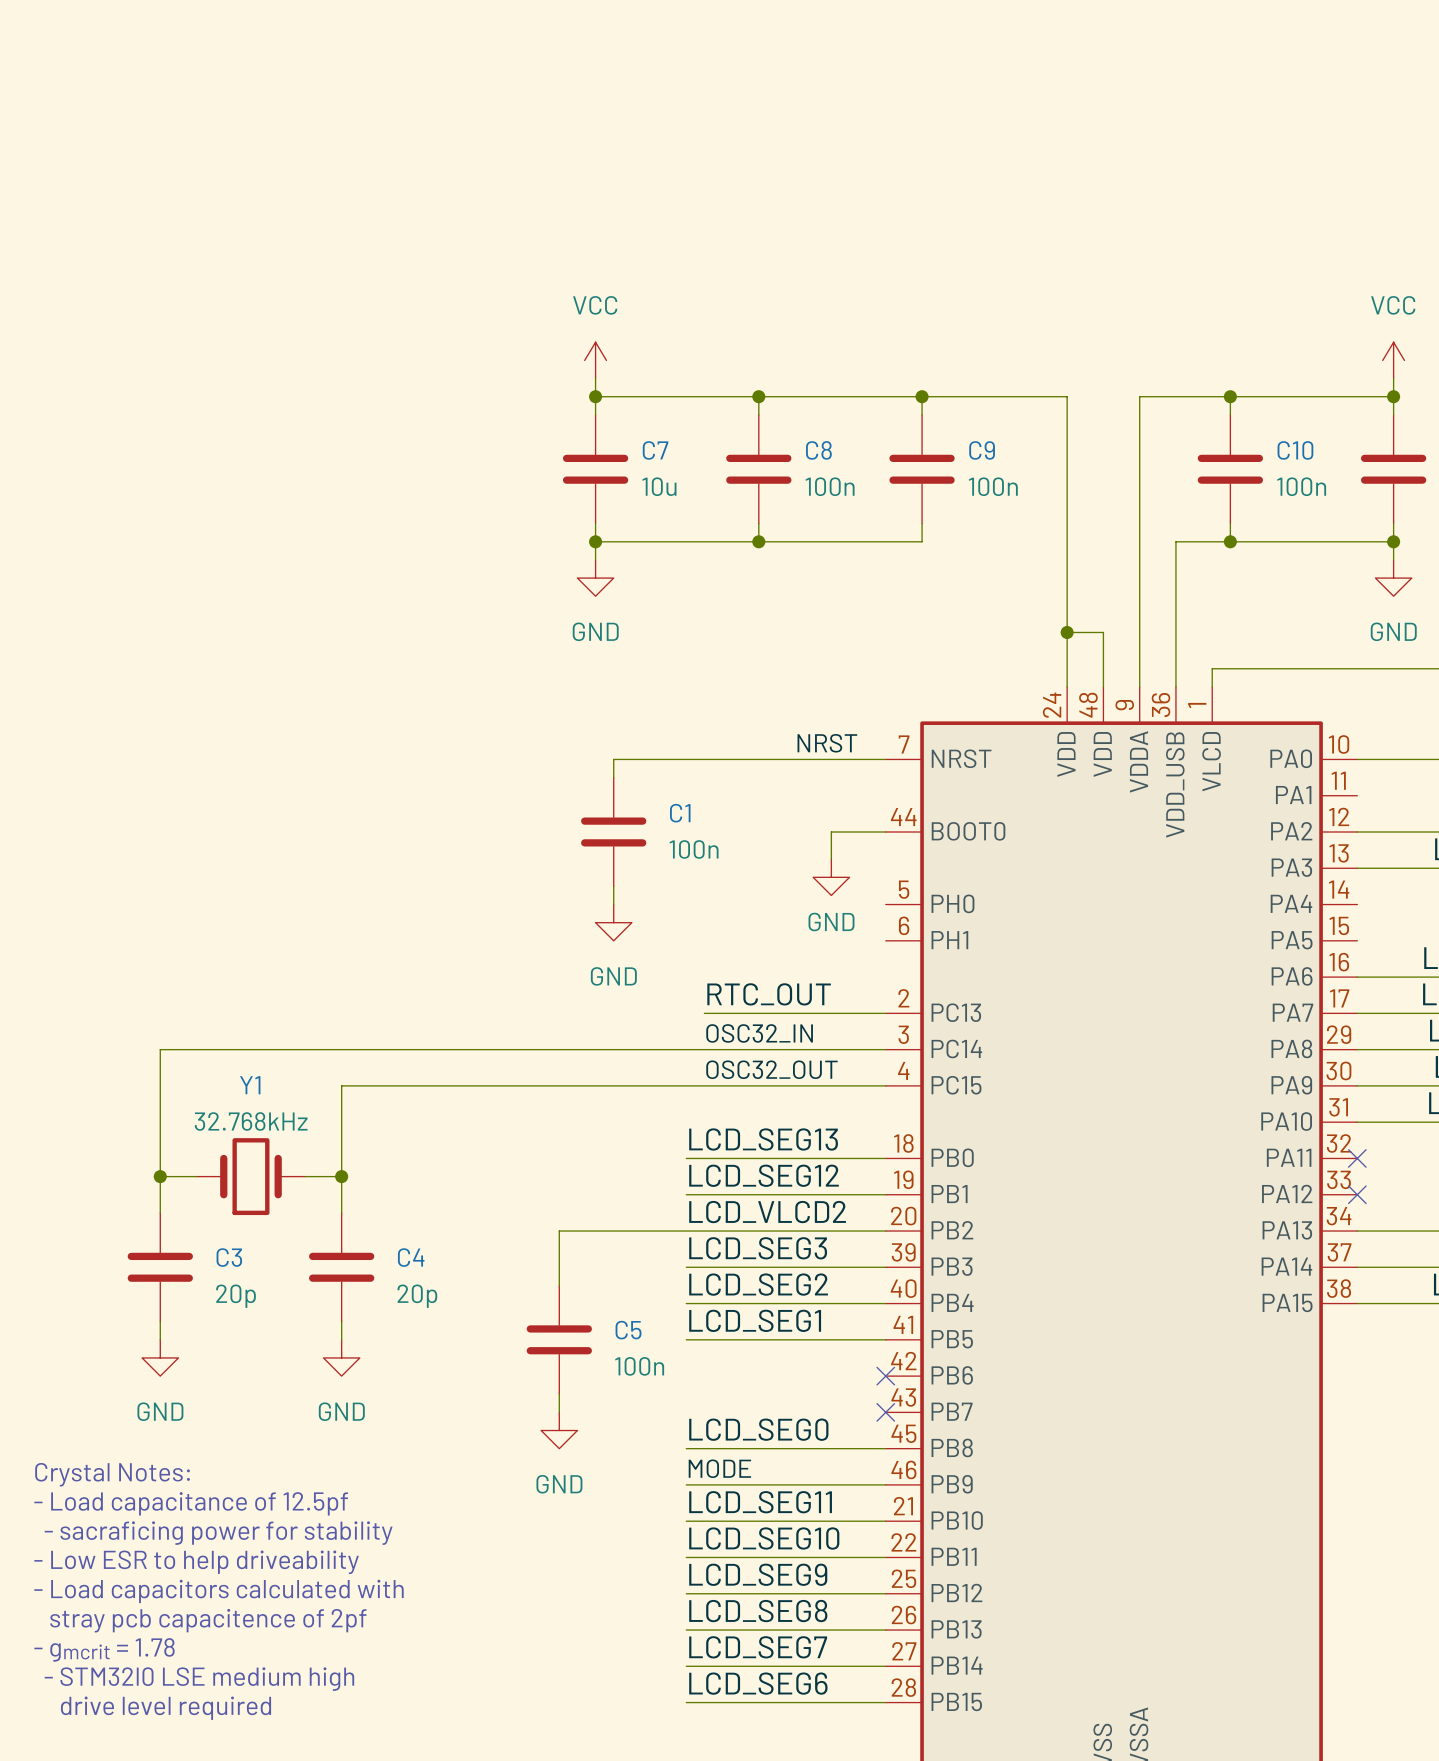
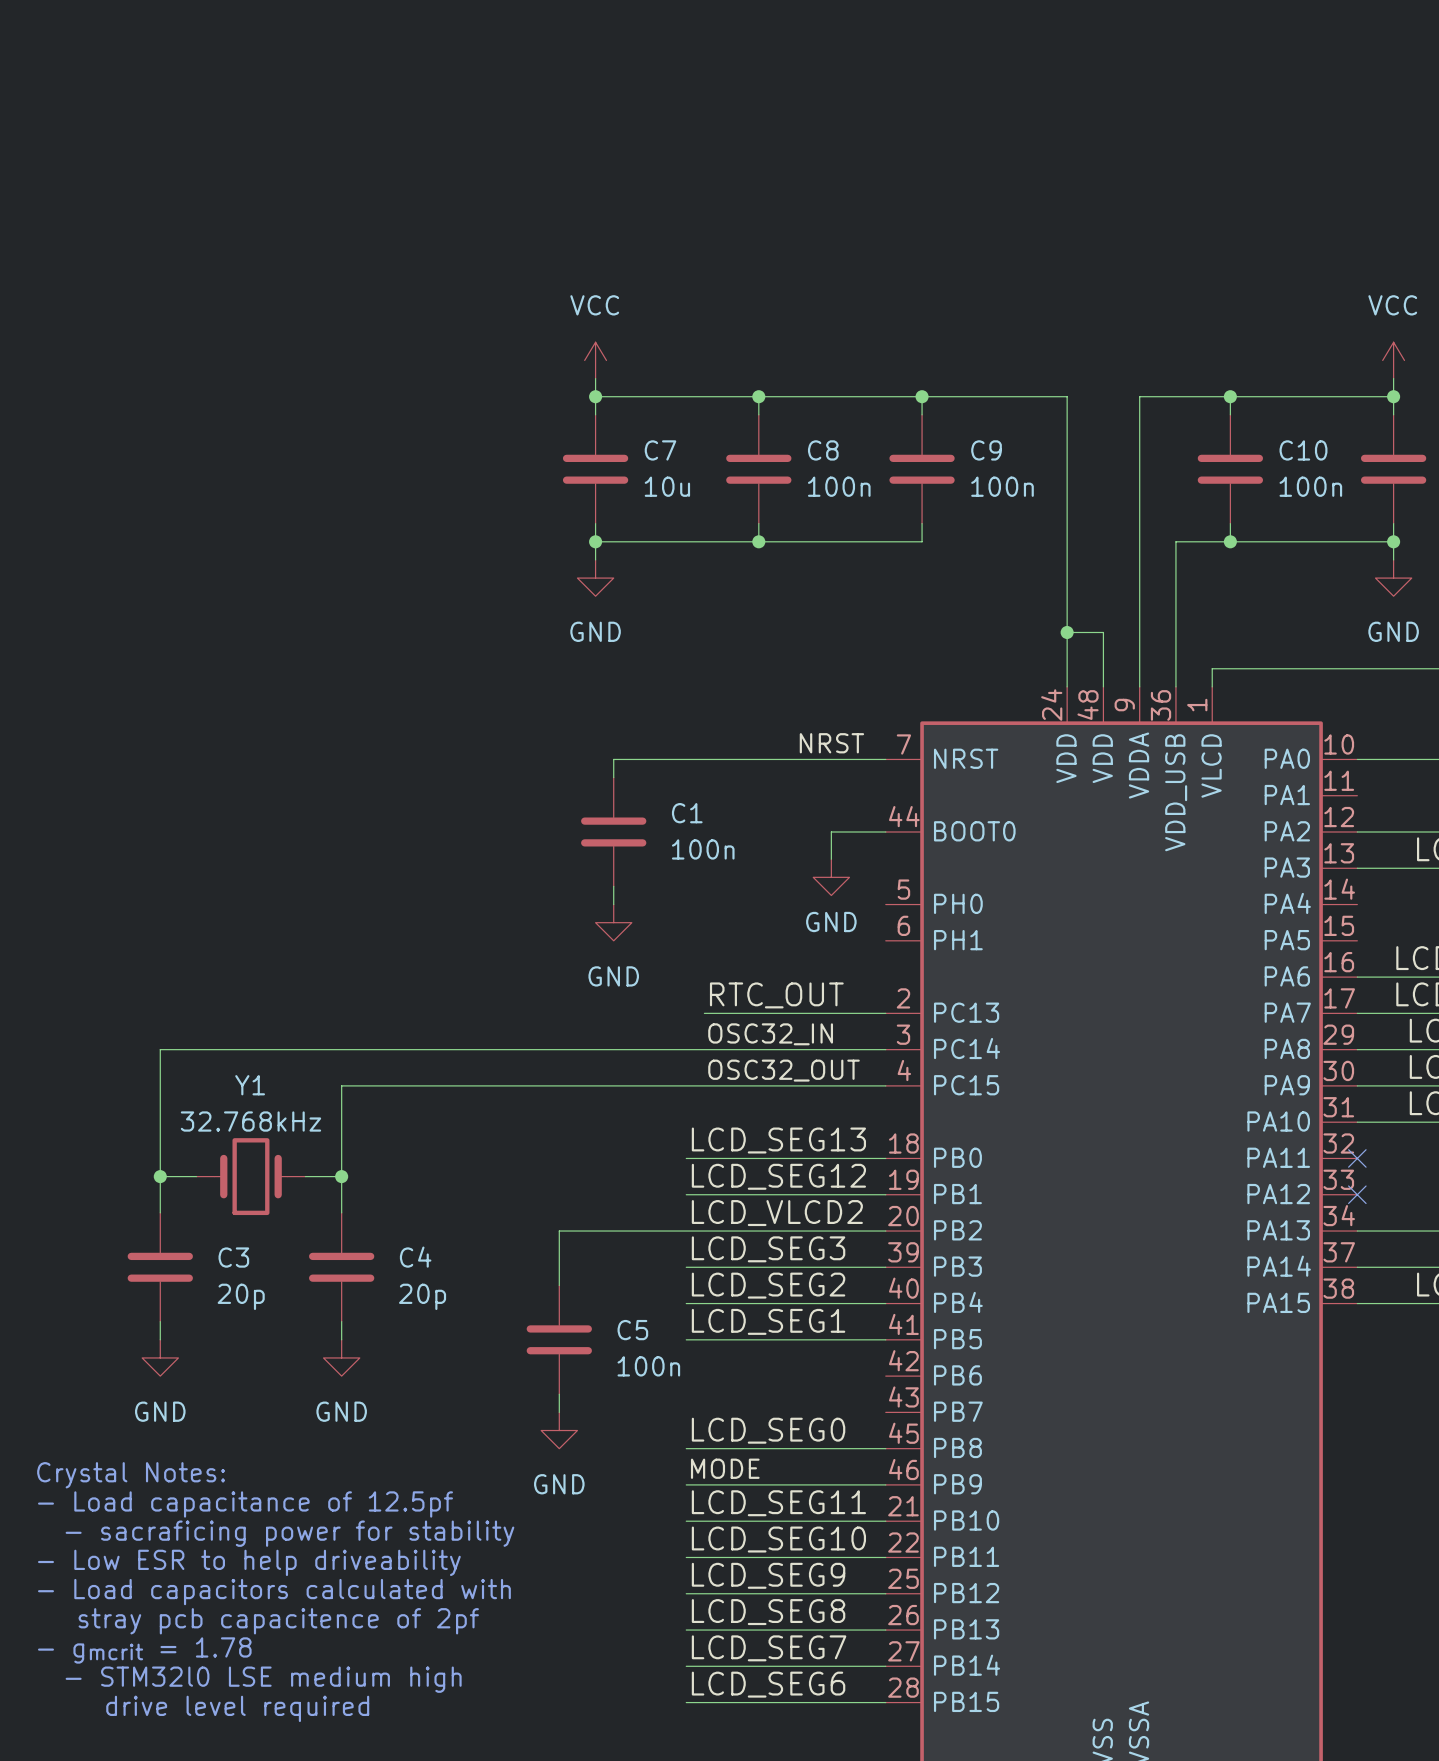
no-connect mark: (885, 1376) -> none
no-connect mark: (885, 1412) -> none

